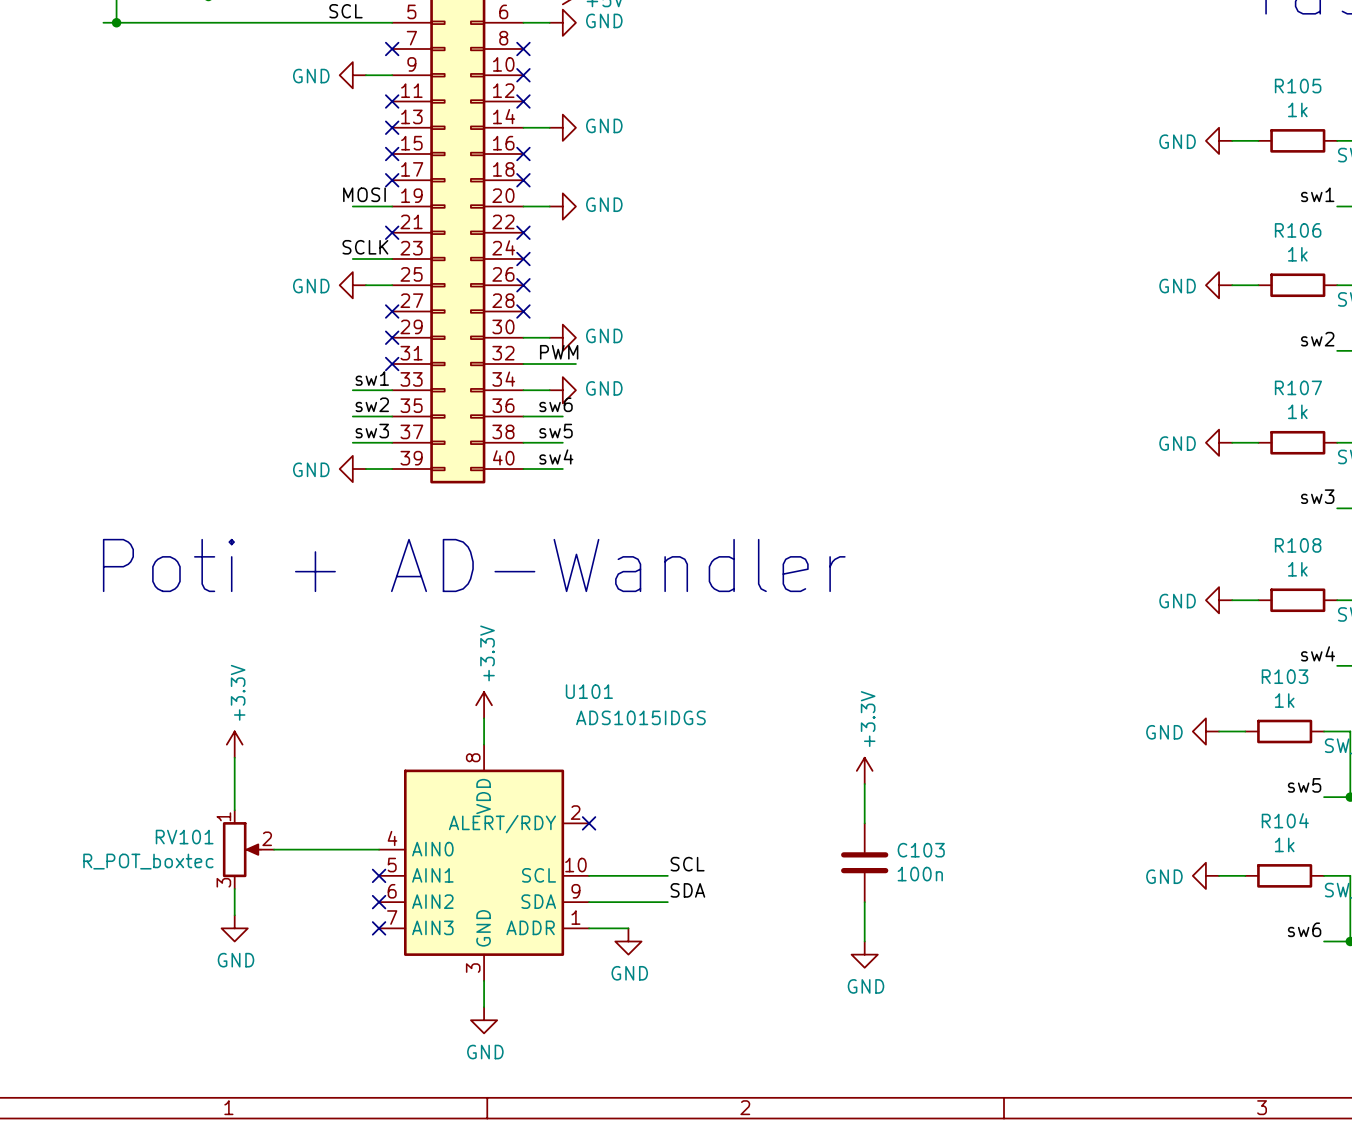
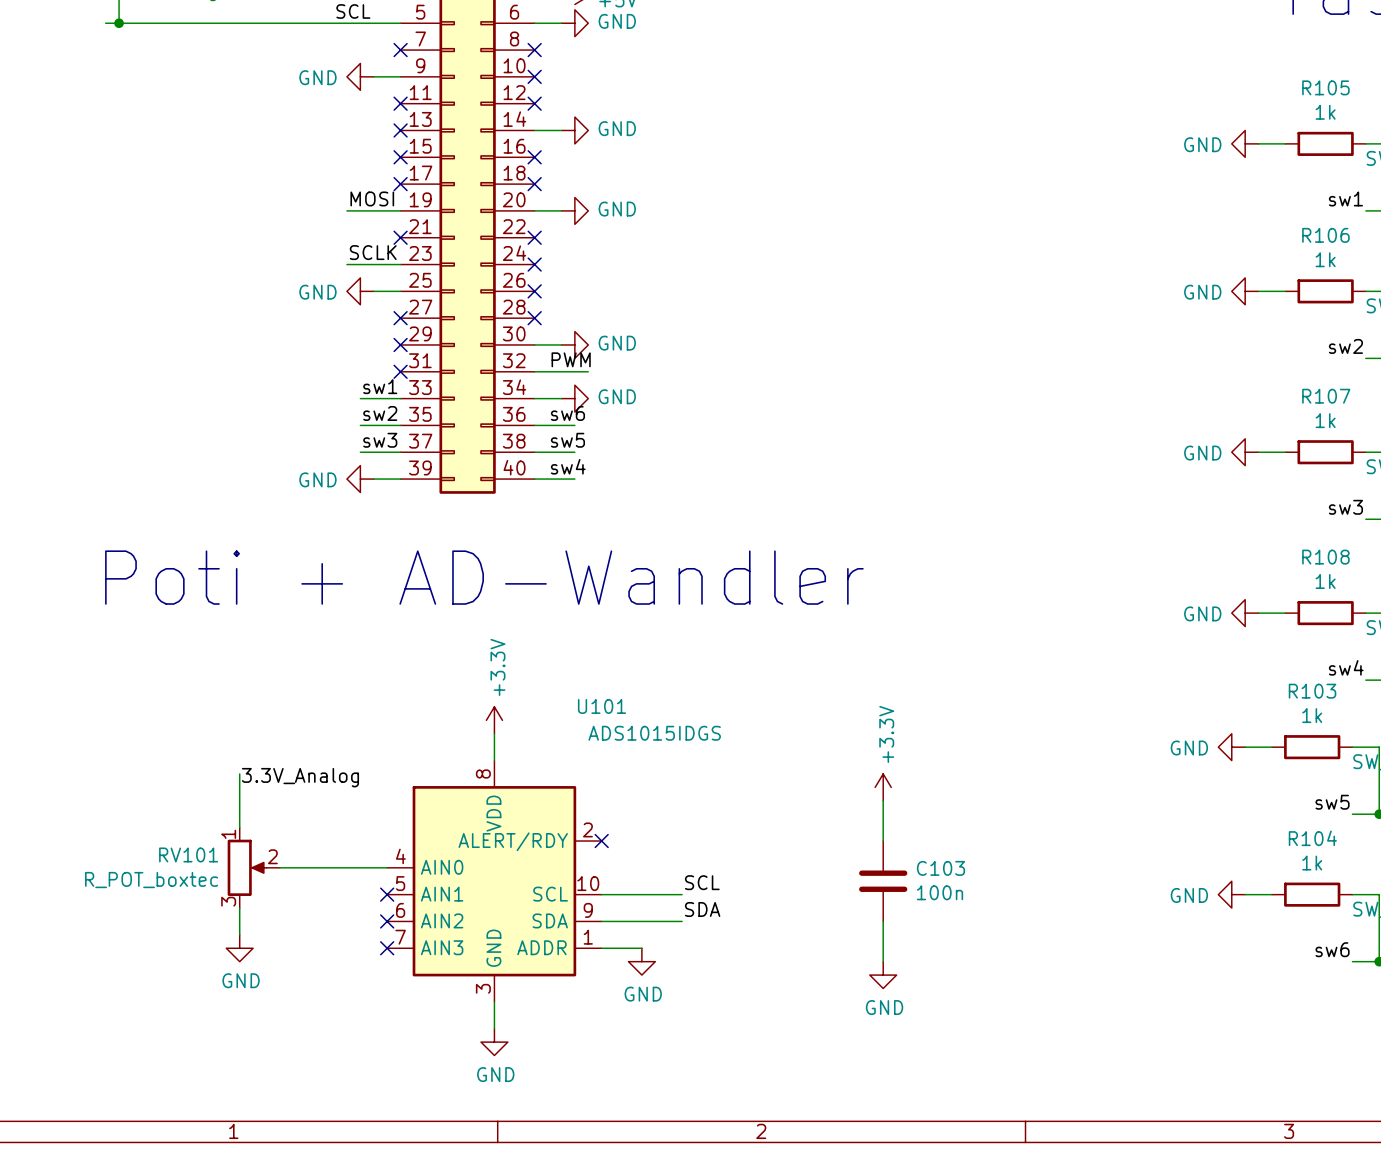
wire: none -> (346, 210) (360, 210)
wire: none -> (346, 264) (360, 264)
power symbol: +3.3V (234, 744) -> none
label: none -> 3.3V_Analog (300, 777)

